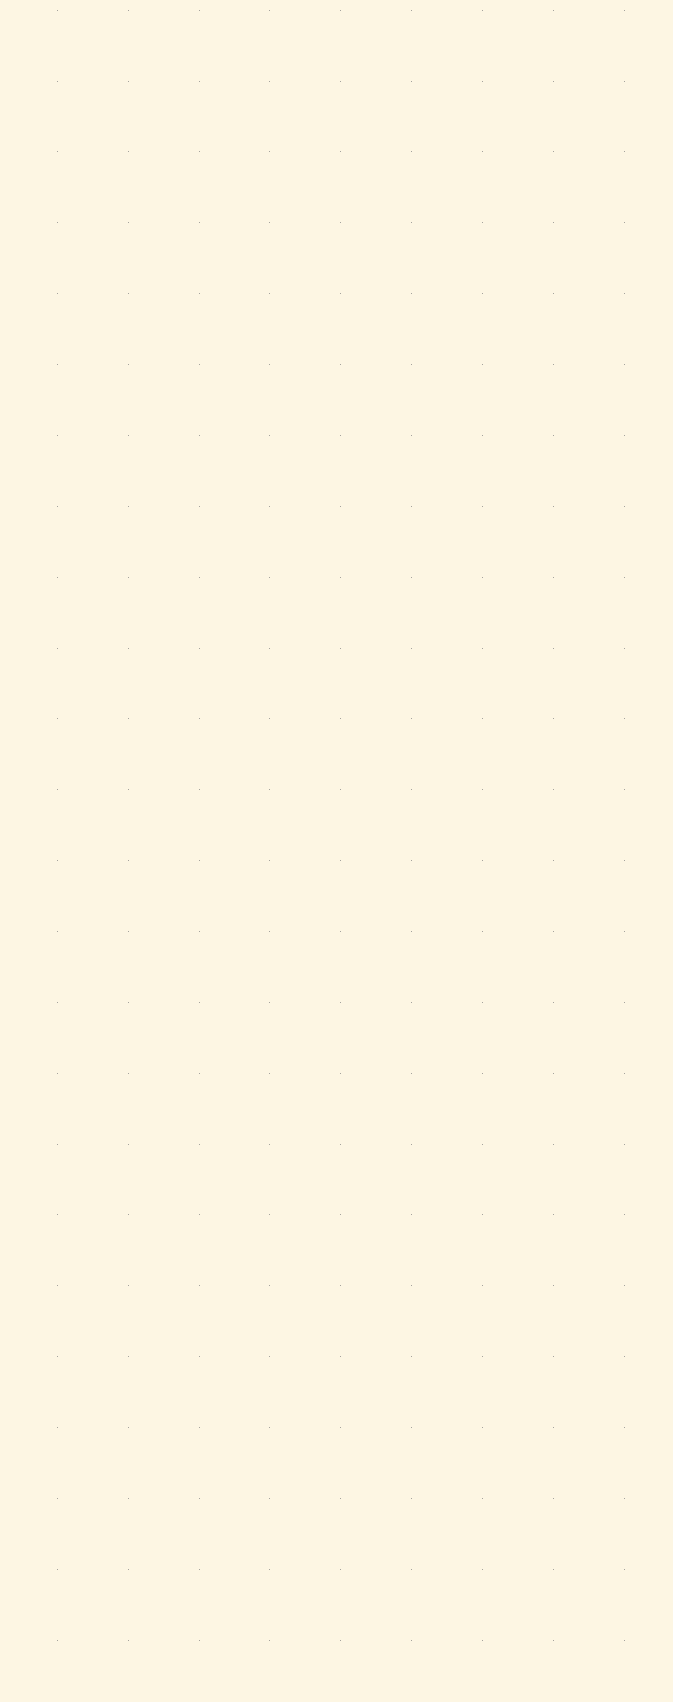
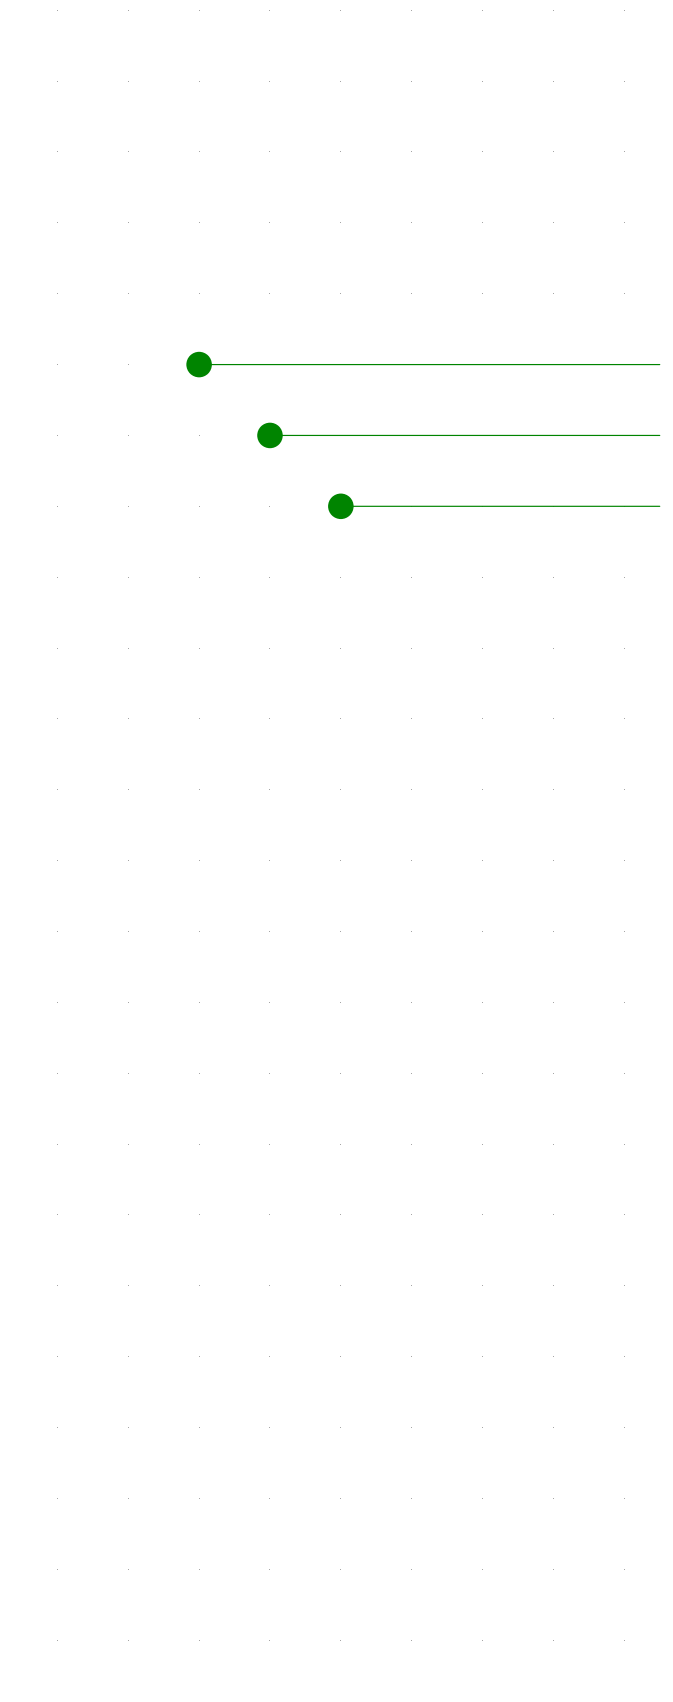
wire: none -> (199, 364) (659, 364)
junction: none -> (199, 364)
wire: none -> (269, 435) (659, 435)
junction: none -> (269, 435)
wire: none -> (340, 506) (659, 506)
junction: none -> (340, 506)

